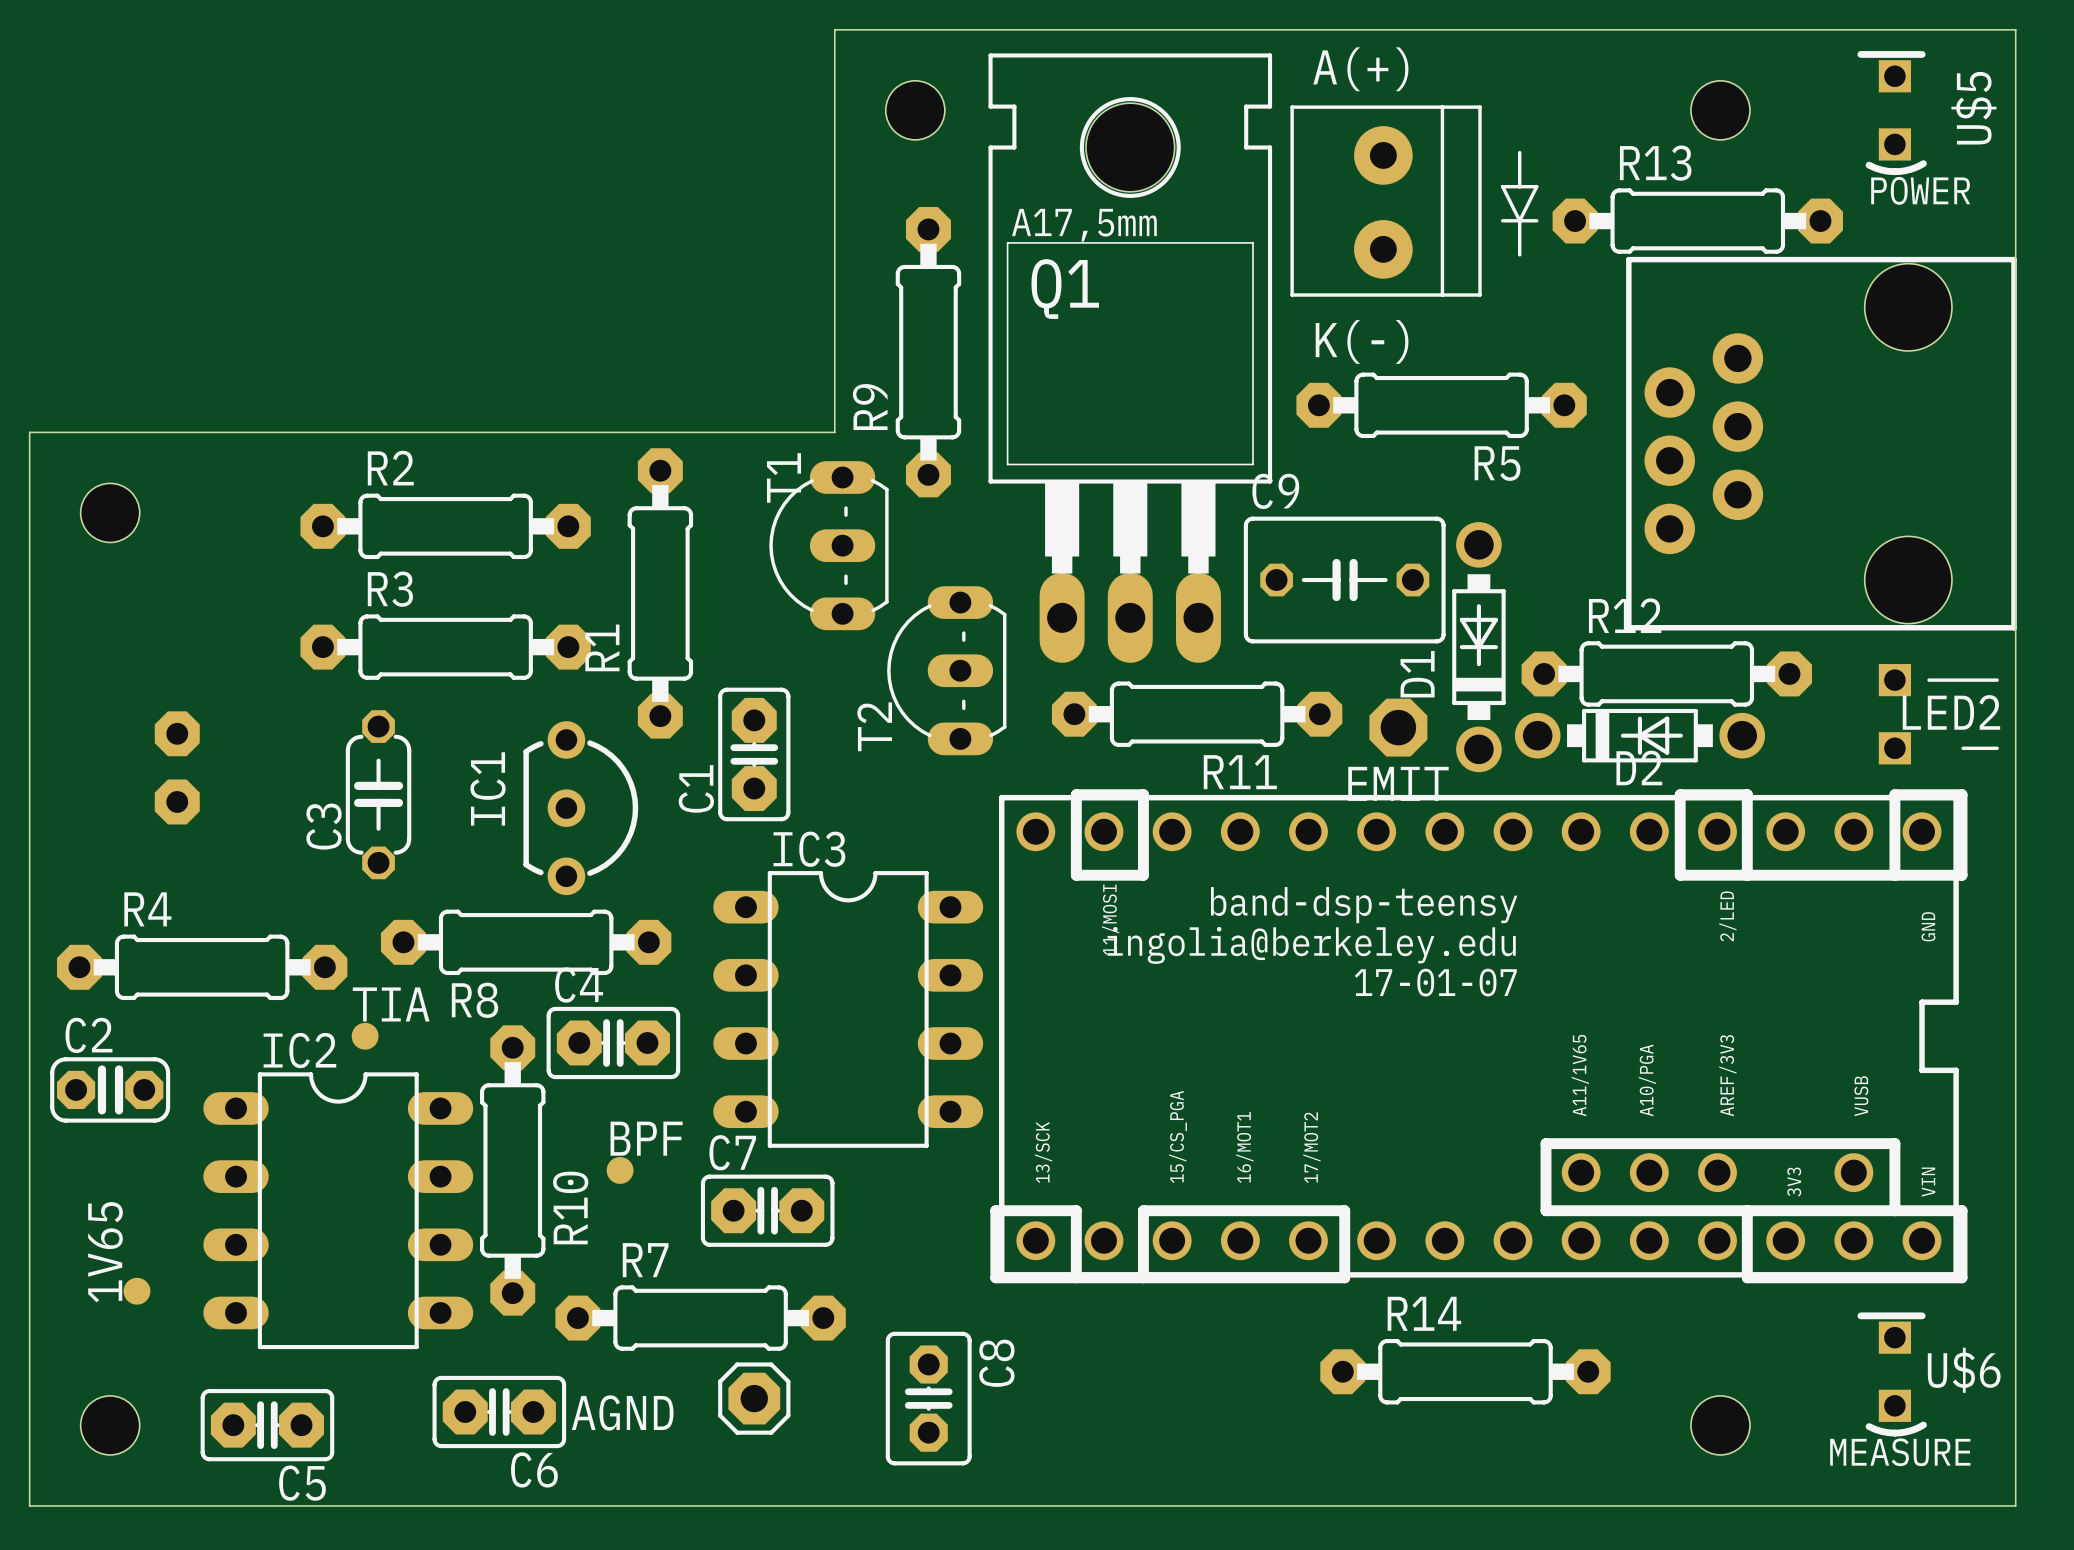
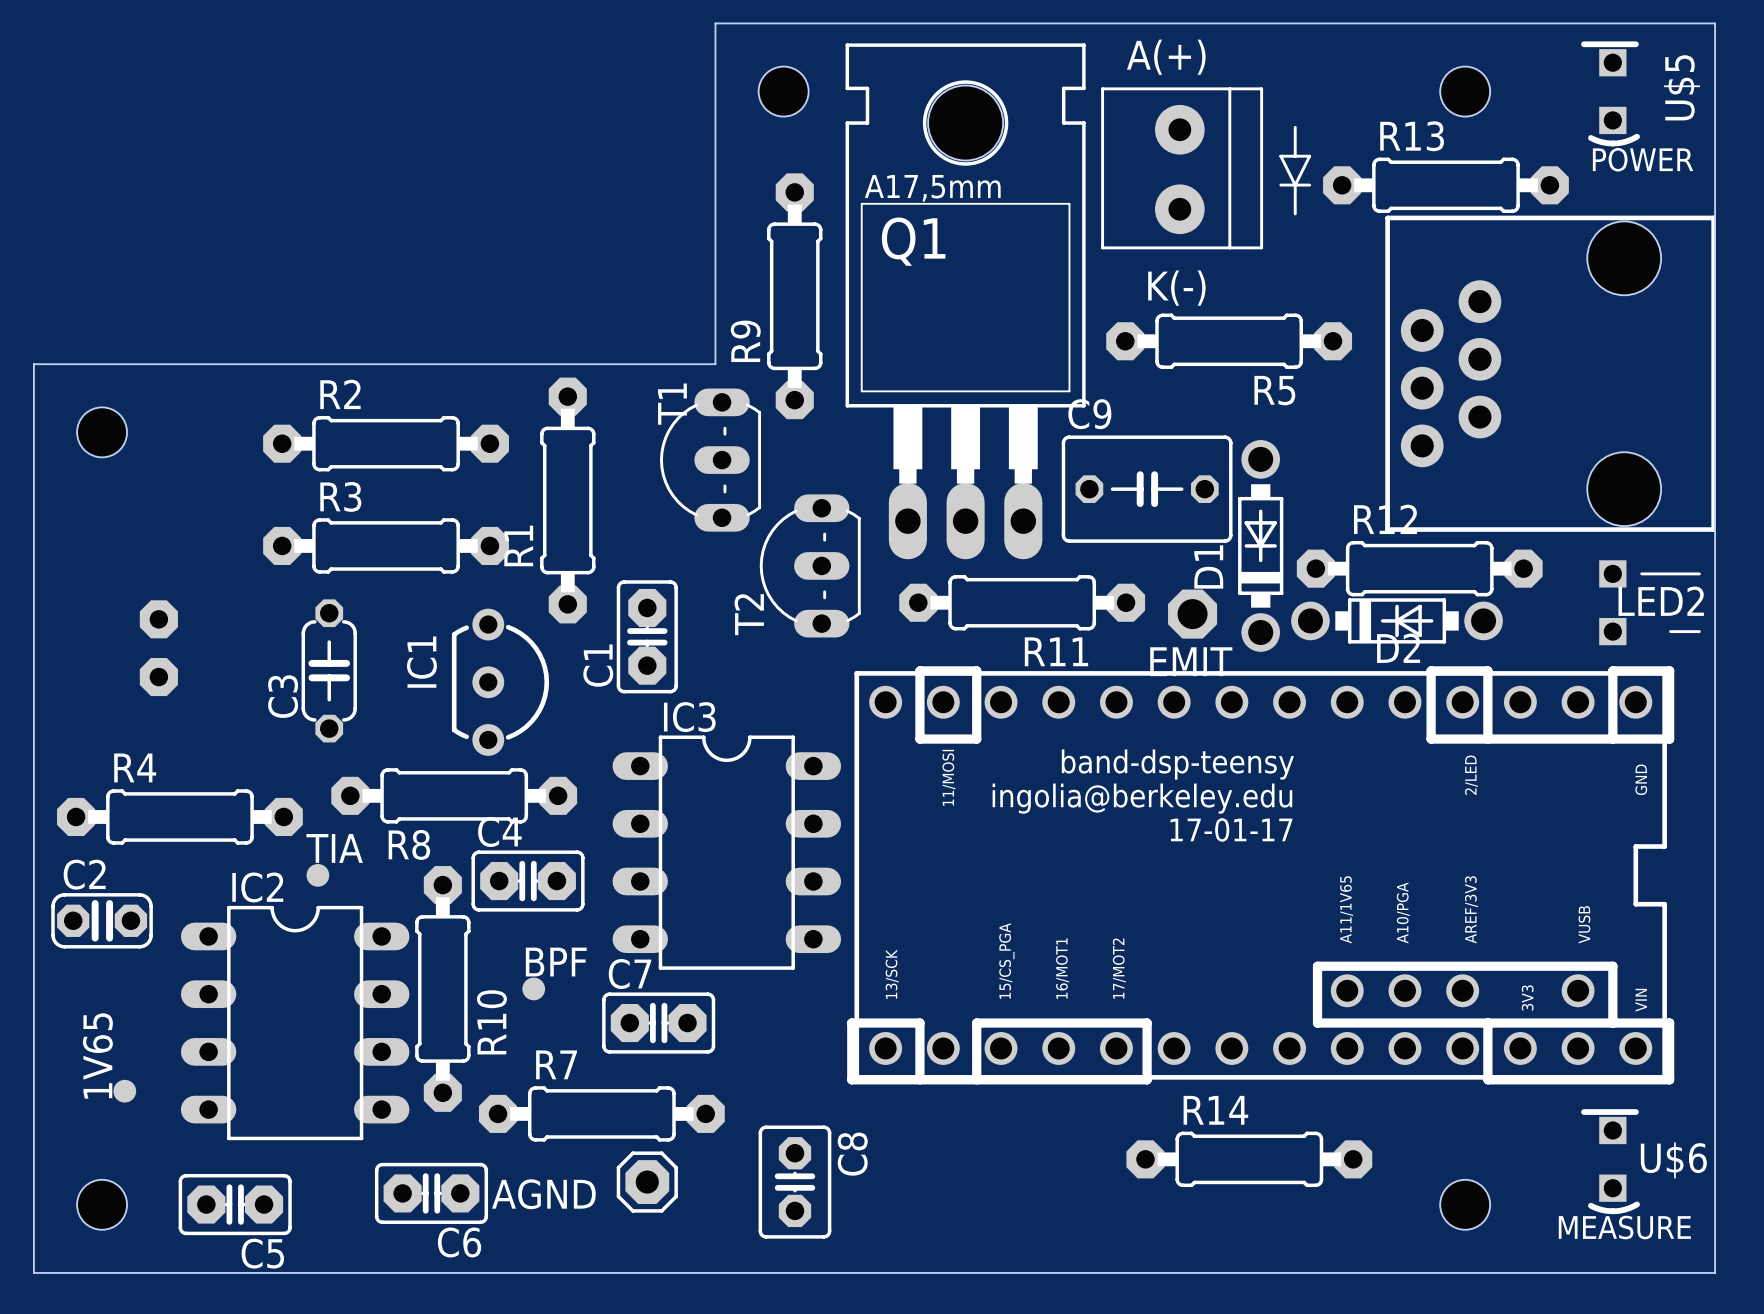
text: 17-01-07 (1435, 982) -> 17-01-17 (1231, 829)

